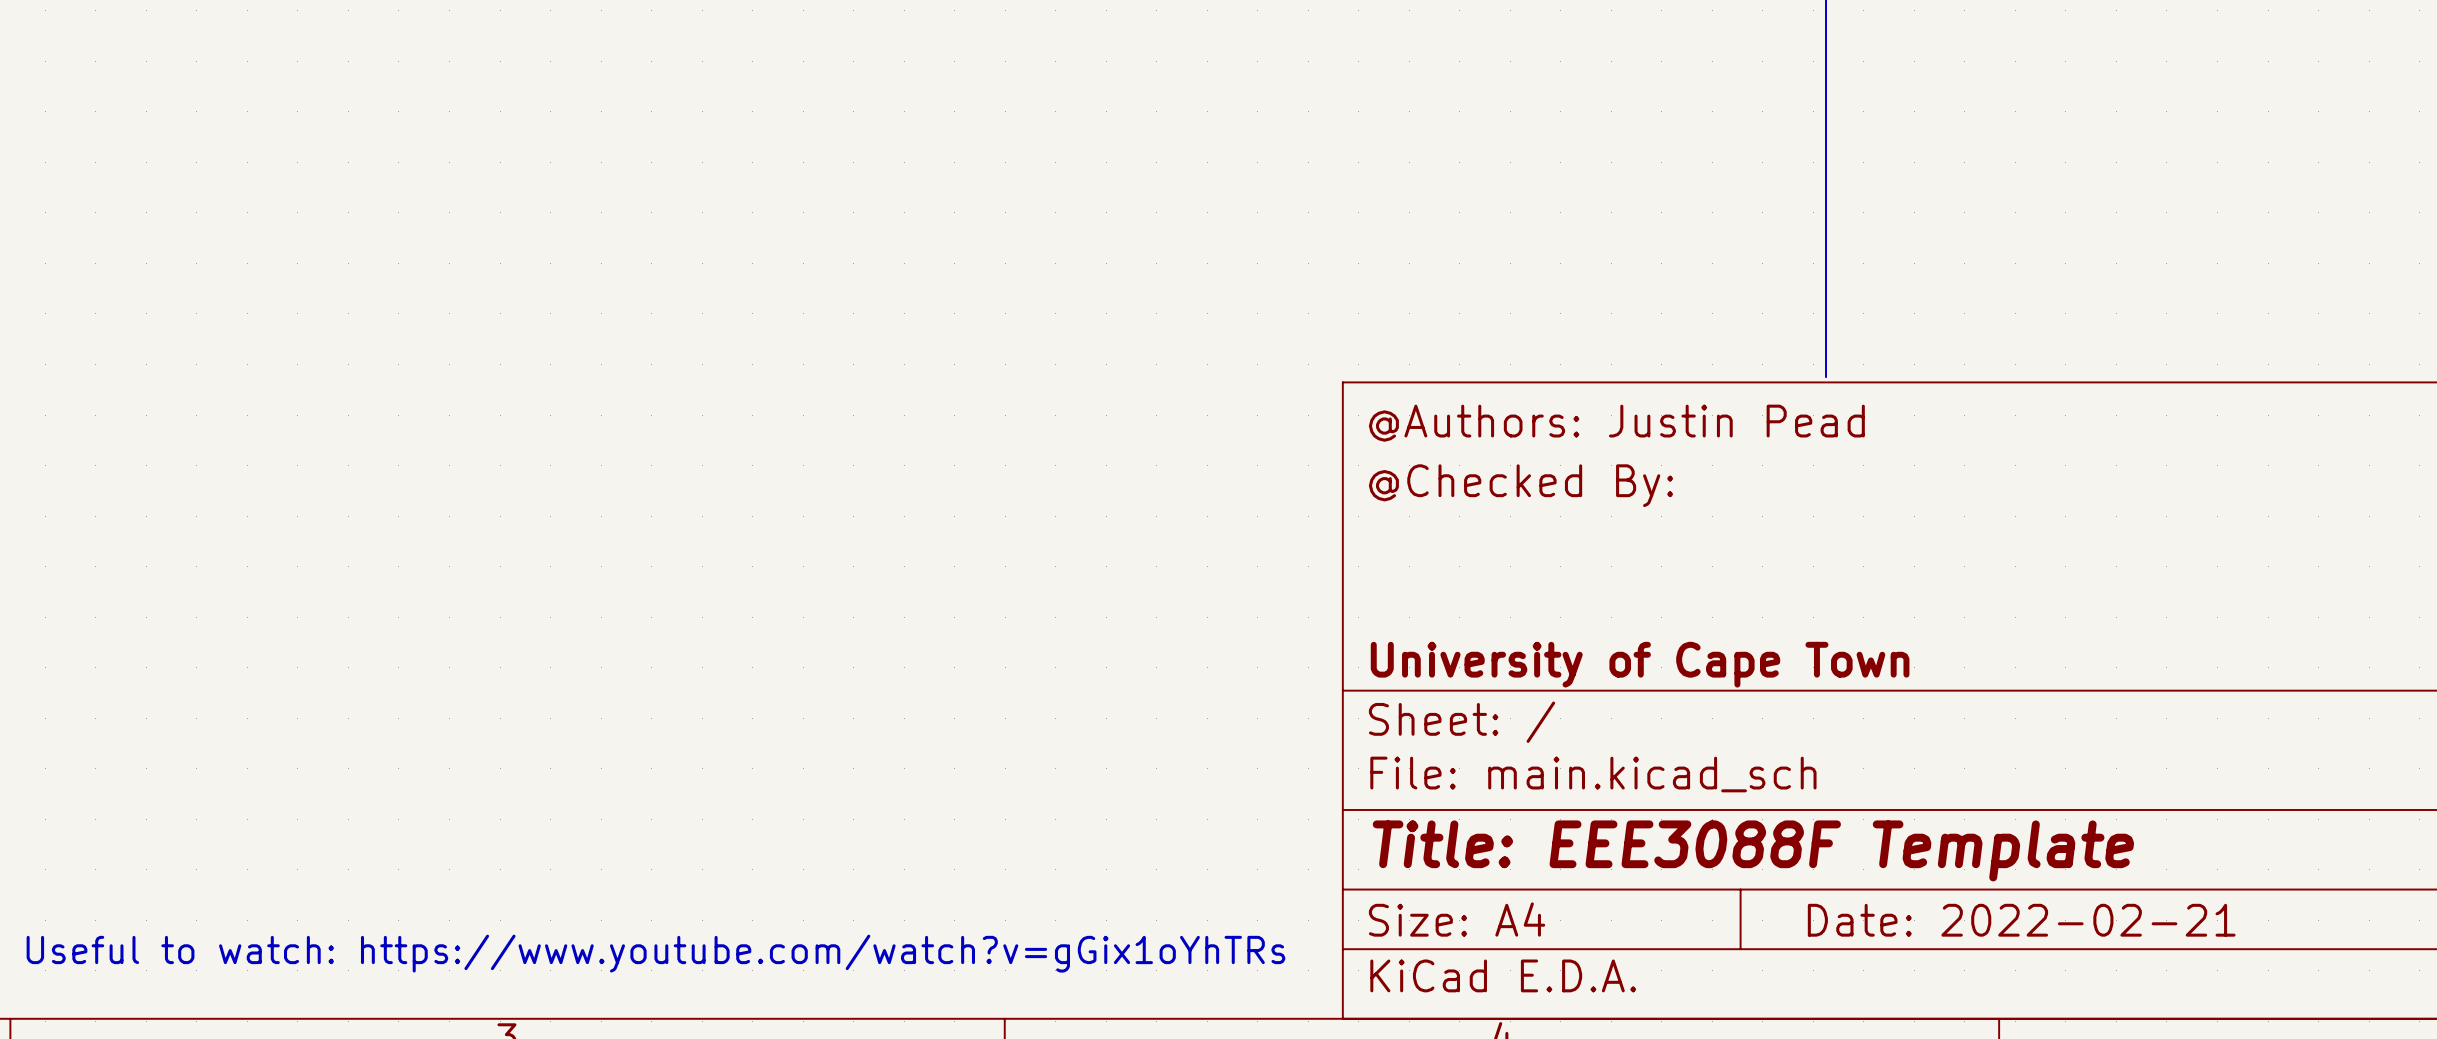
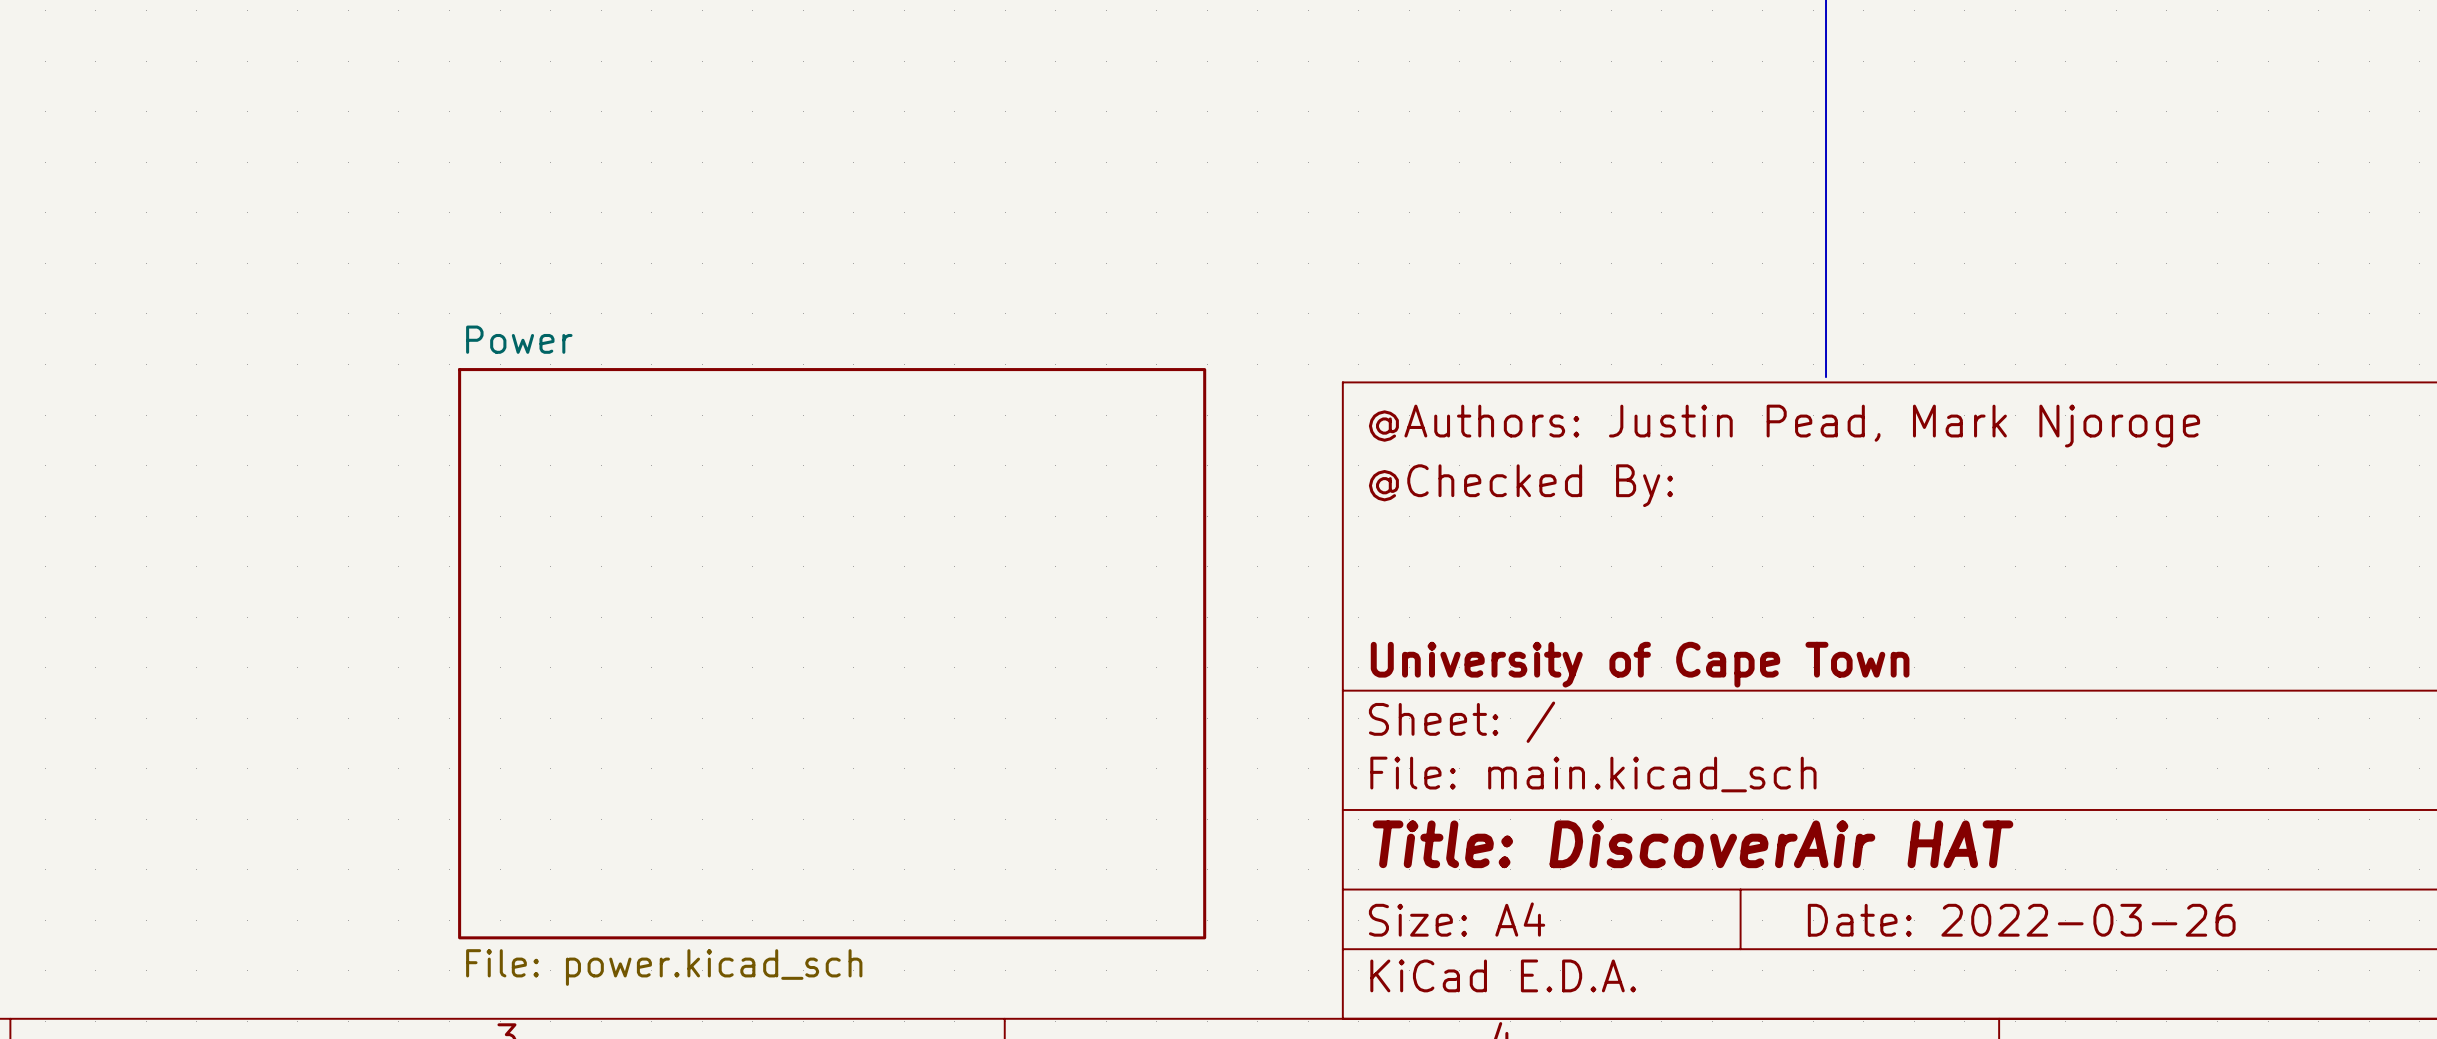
title block: @Authors: Justin Pead (1616, 423) -> @Authors: Justin Pead, Mark Njoroge (1784, 426)
sheet Power: none -> File: power.kicad_sch (832, 653)
title block: Title: EEE3088F Template (1753, 850) -> Title: DiscoverAir HAT (1693, 844)
title block: Date: 2022-02-21 (2021, 920) -> Date: 2022-03-26 (2021, 920)
text: Useful to watch: https://www.youtube.com/watch?v=gGix1oYhTRs (655, 953) -> none

